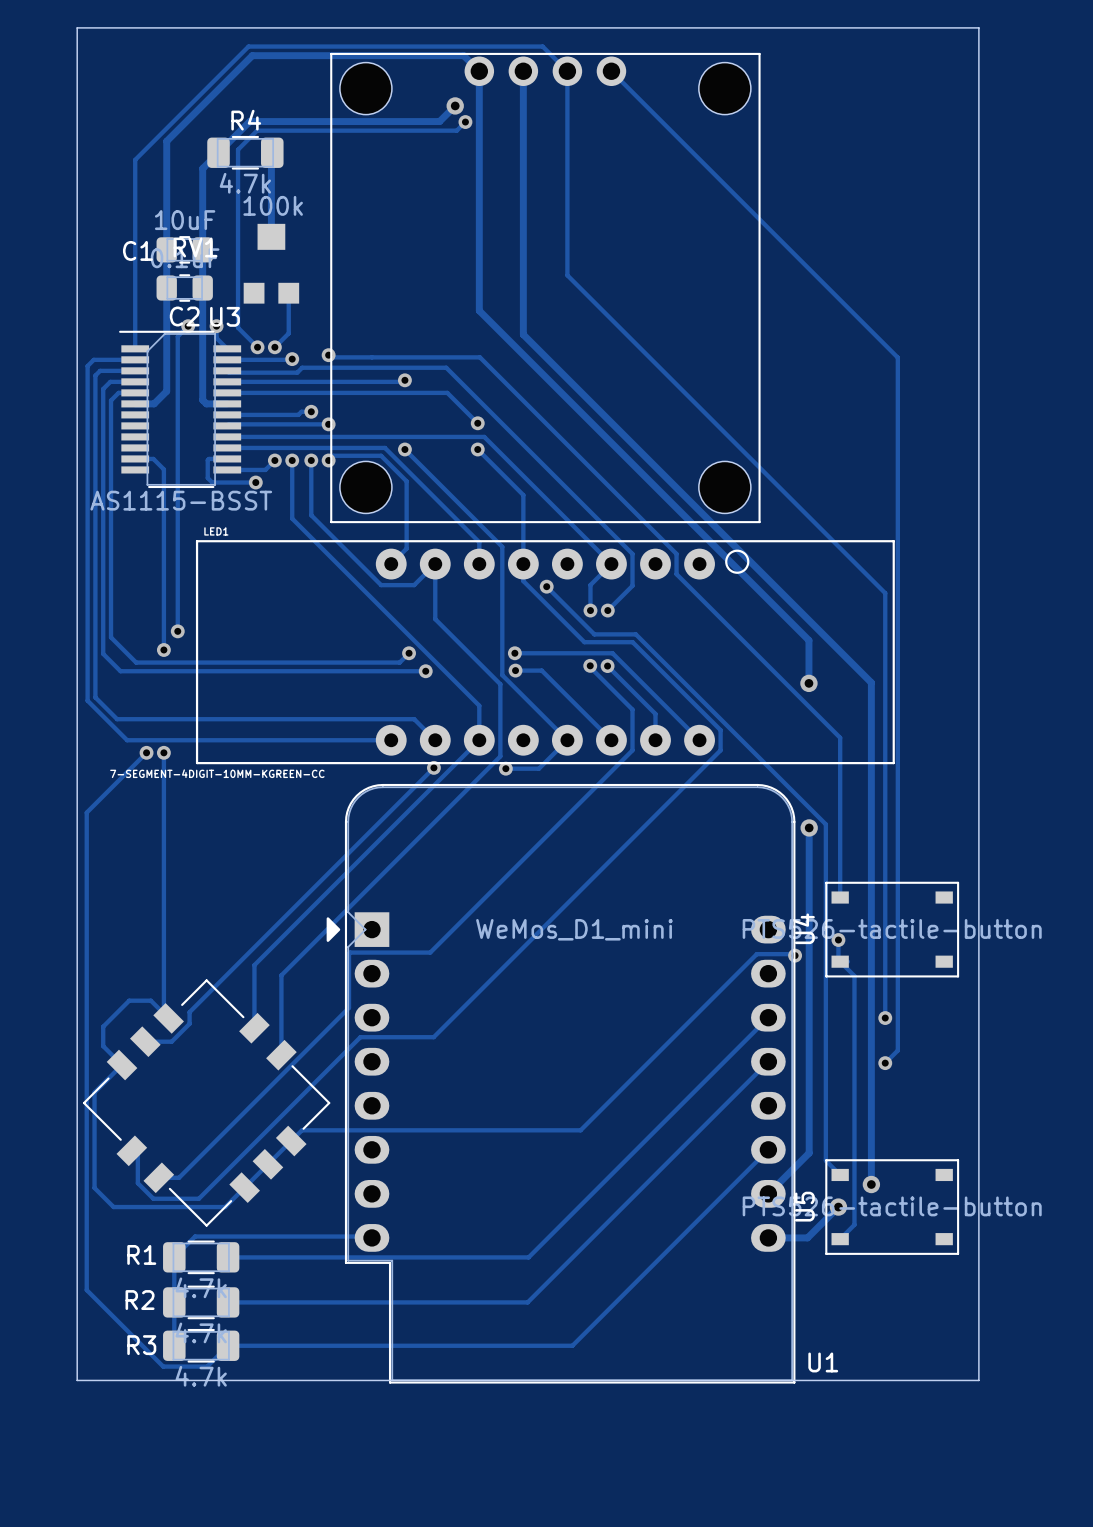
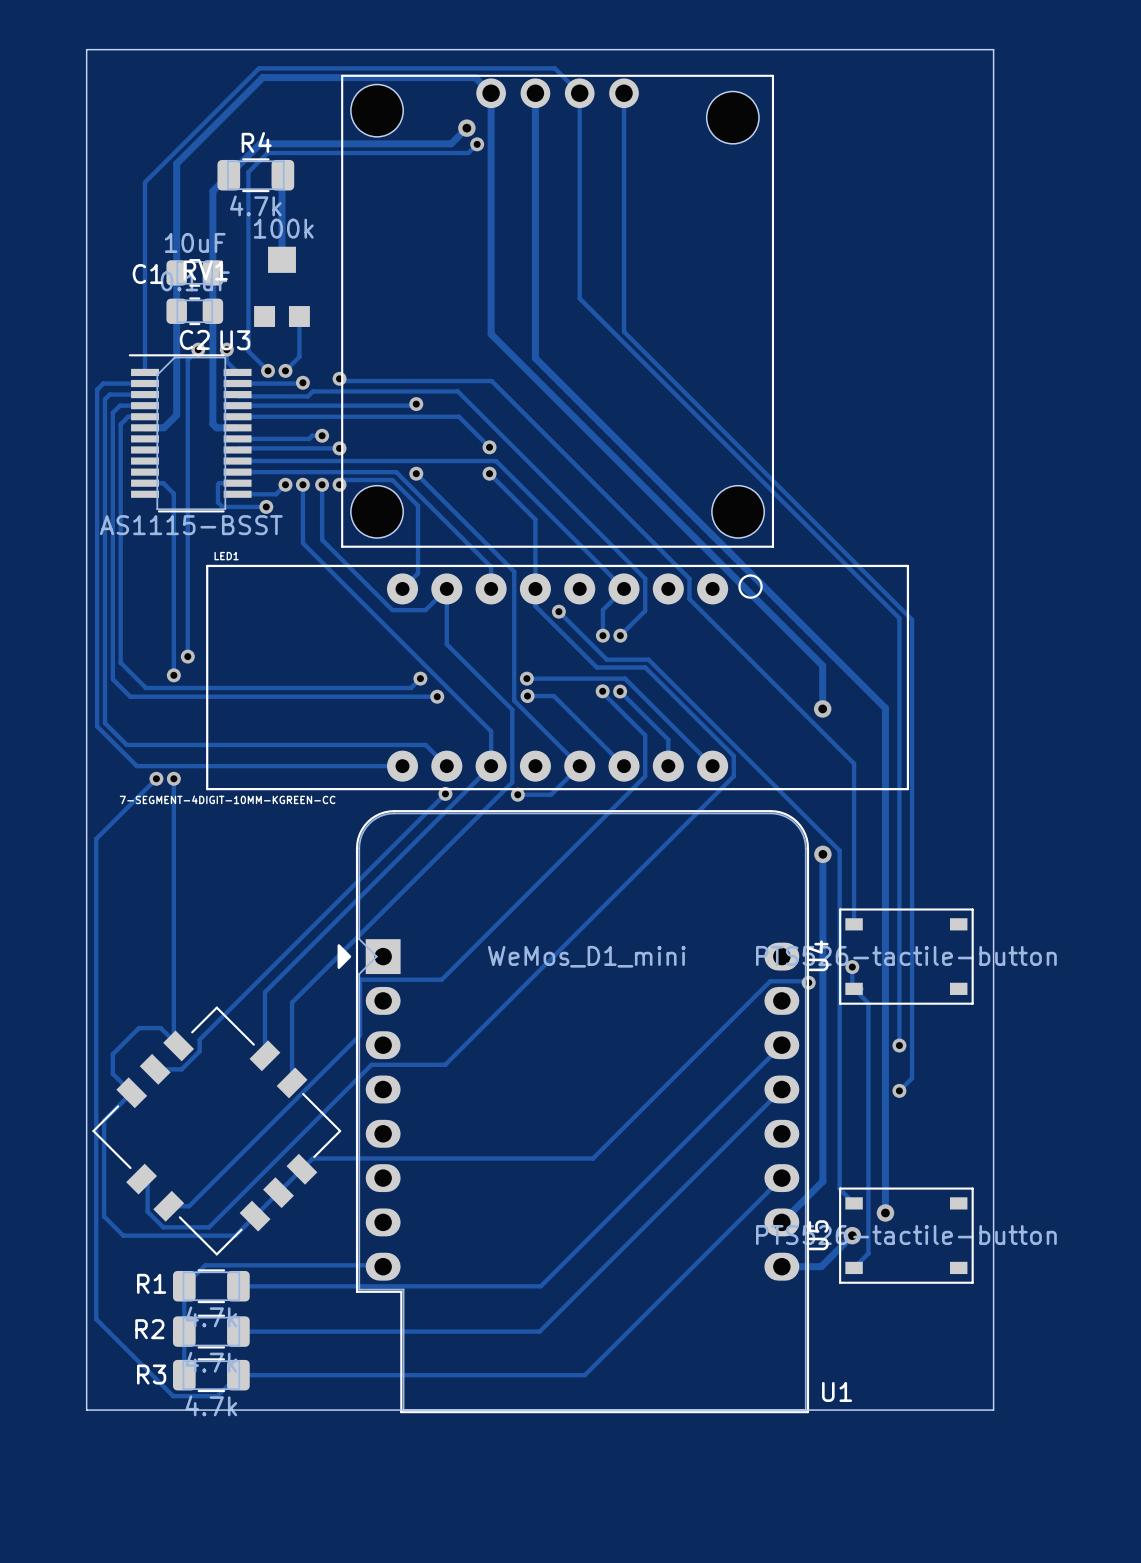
part footprint: [330, 52, 761, 524] -> [341, 74, 775, 548]
track: (611, 71) (897, 357) (897, 594) -> (624, 93) (624, 331) (912, 619)

